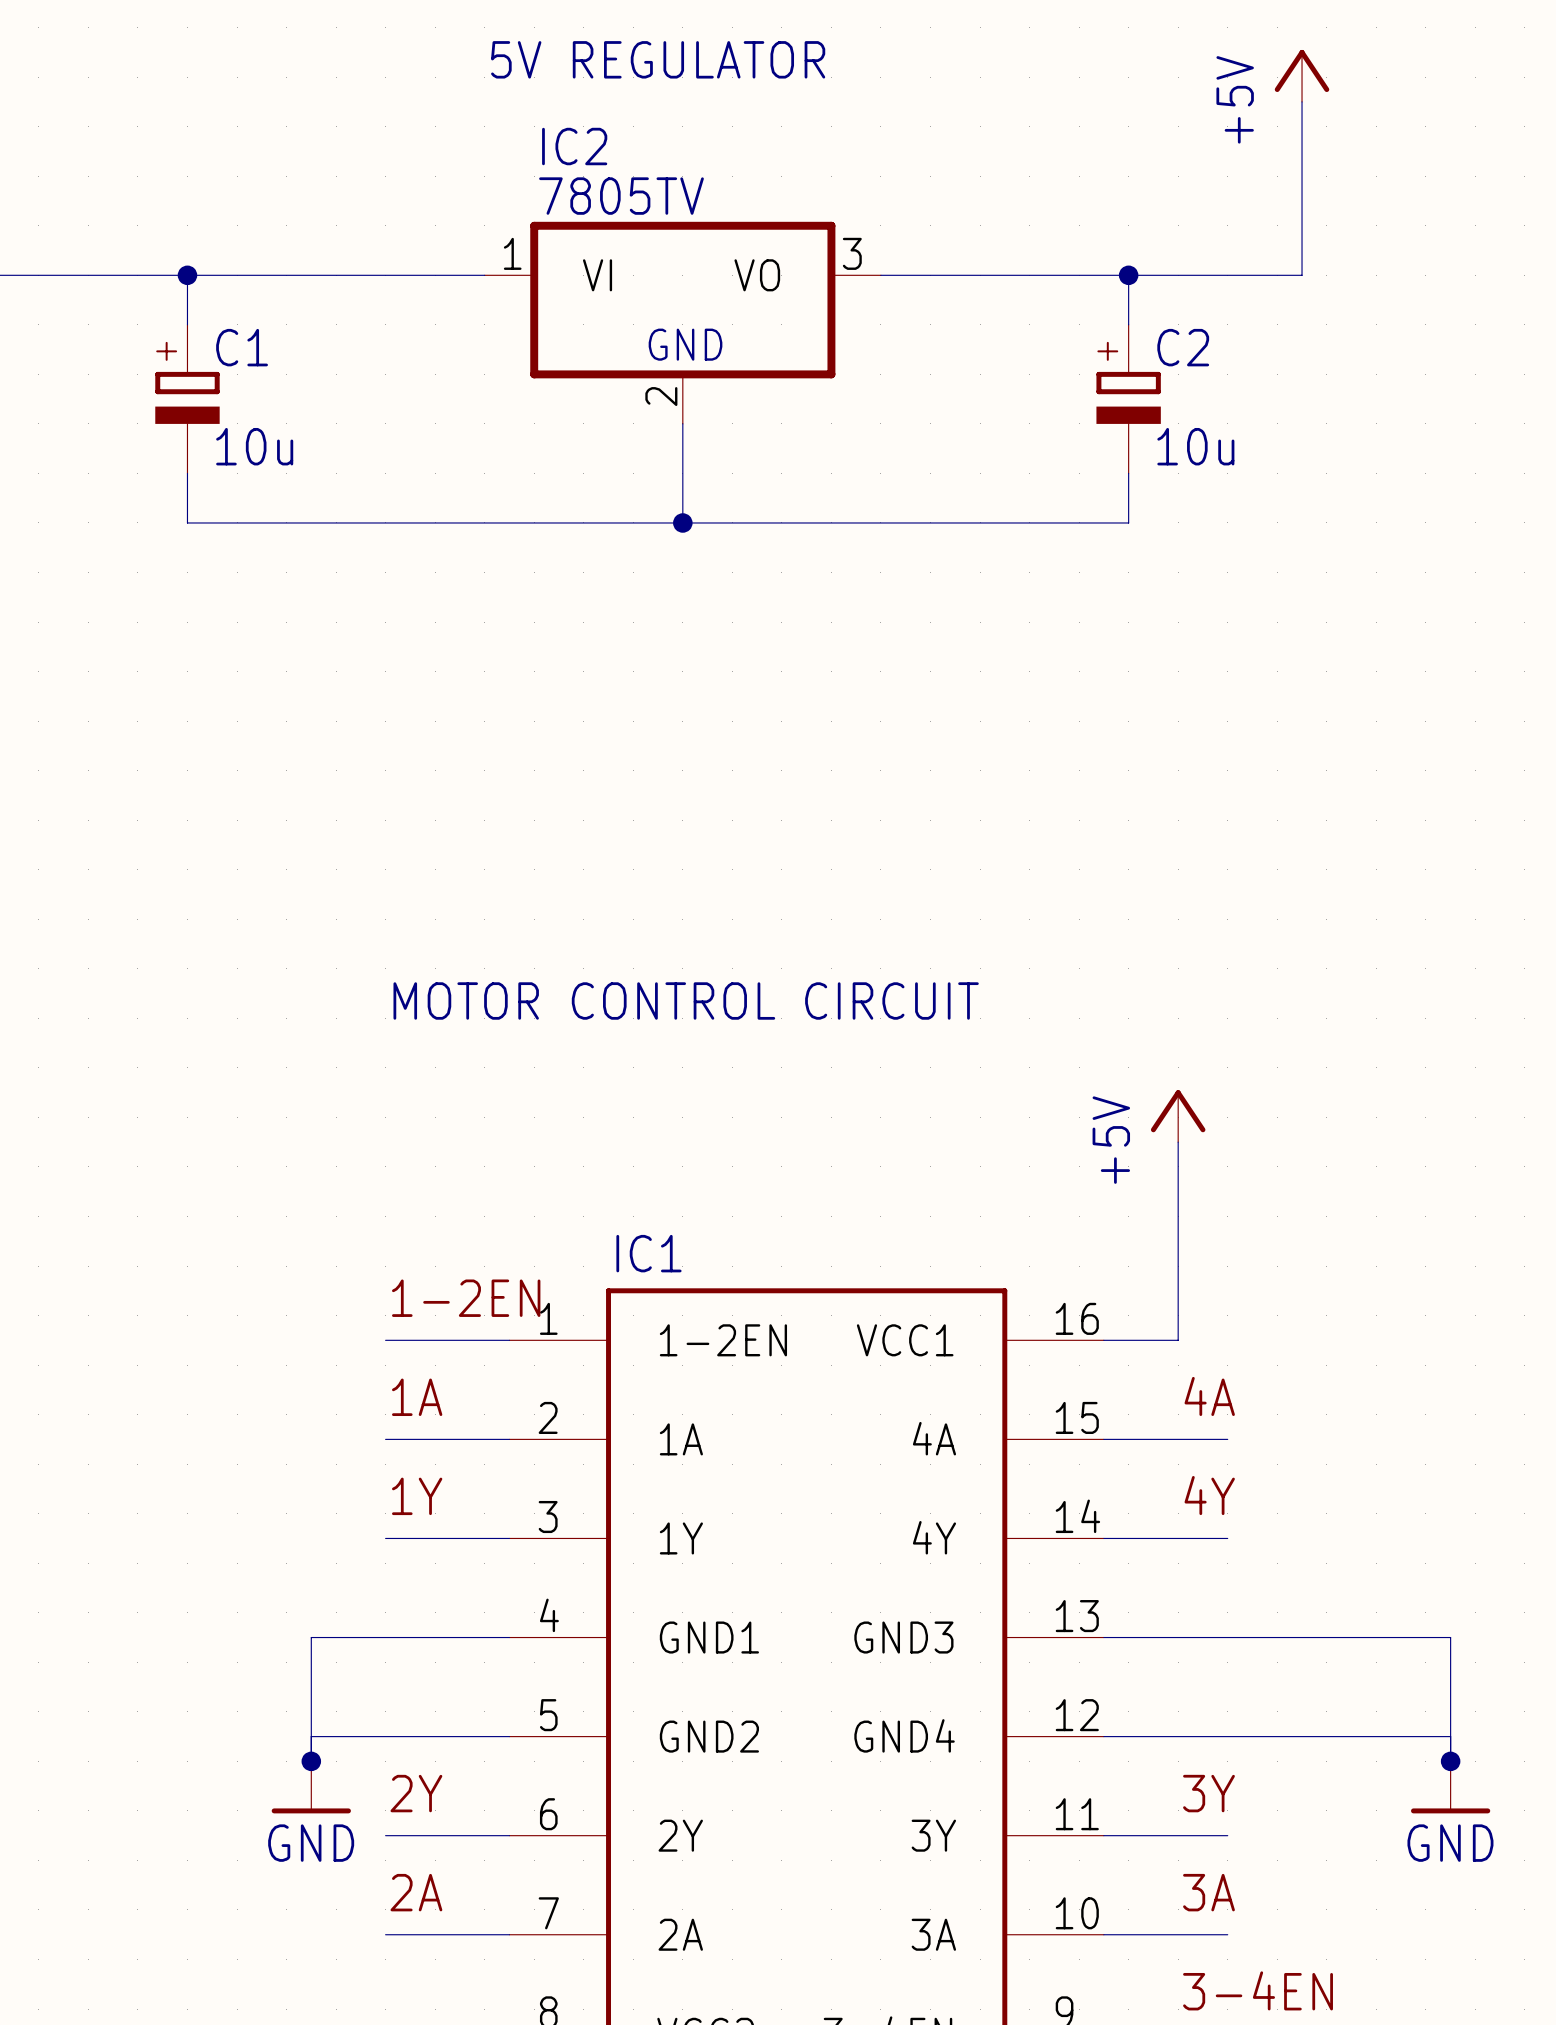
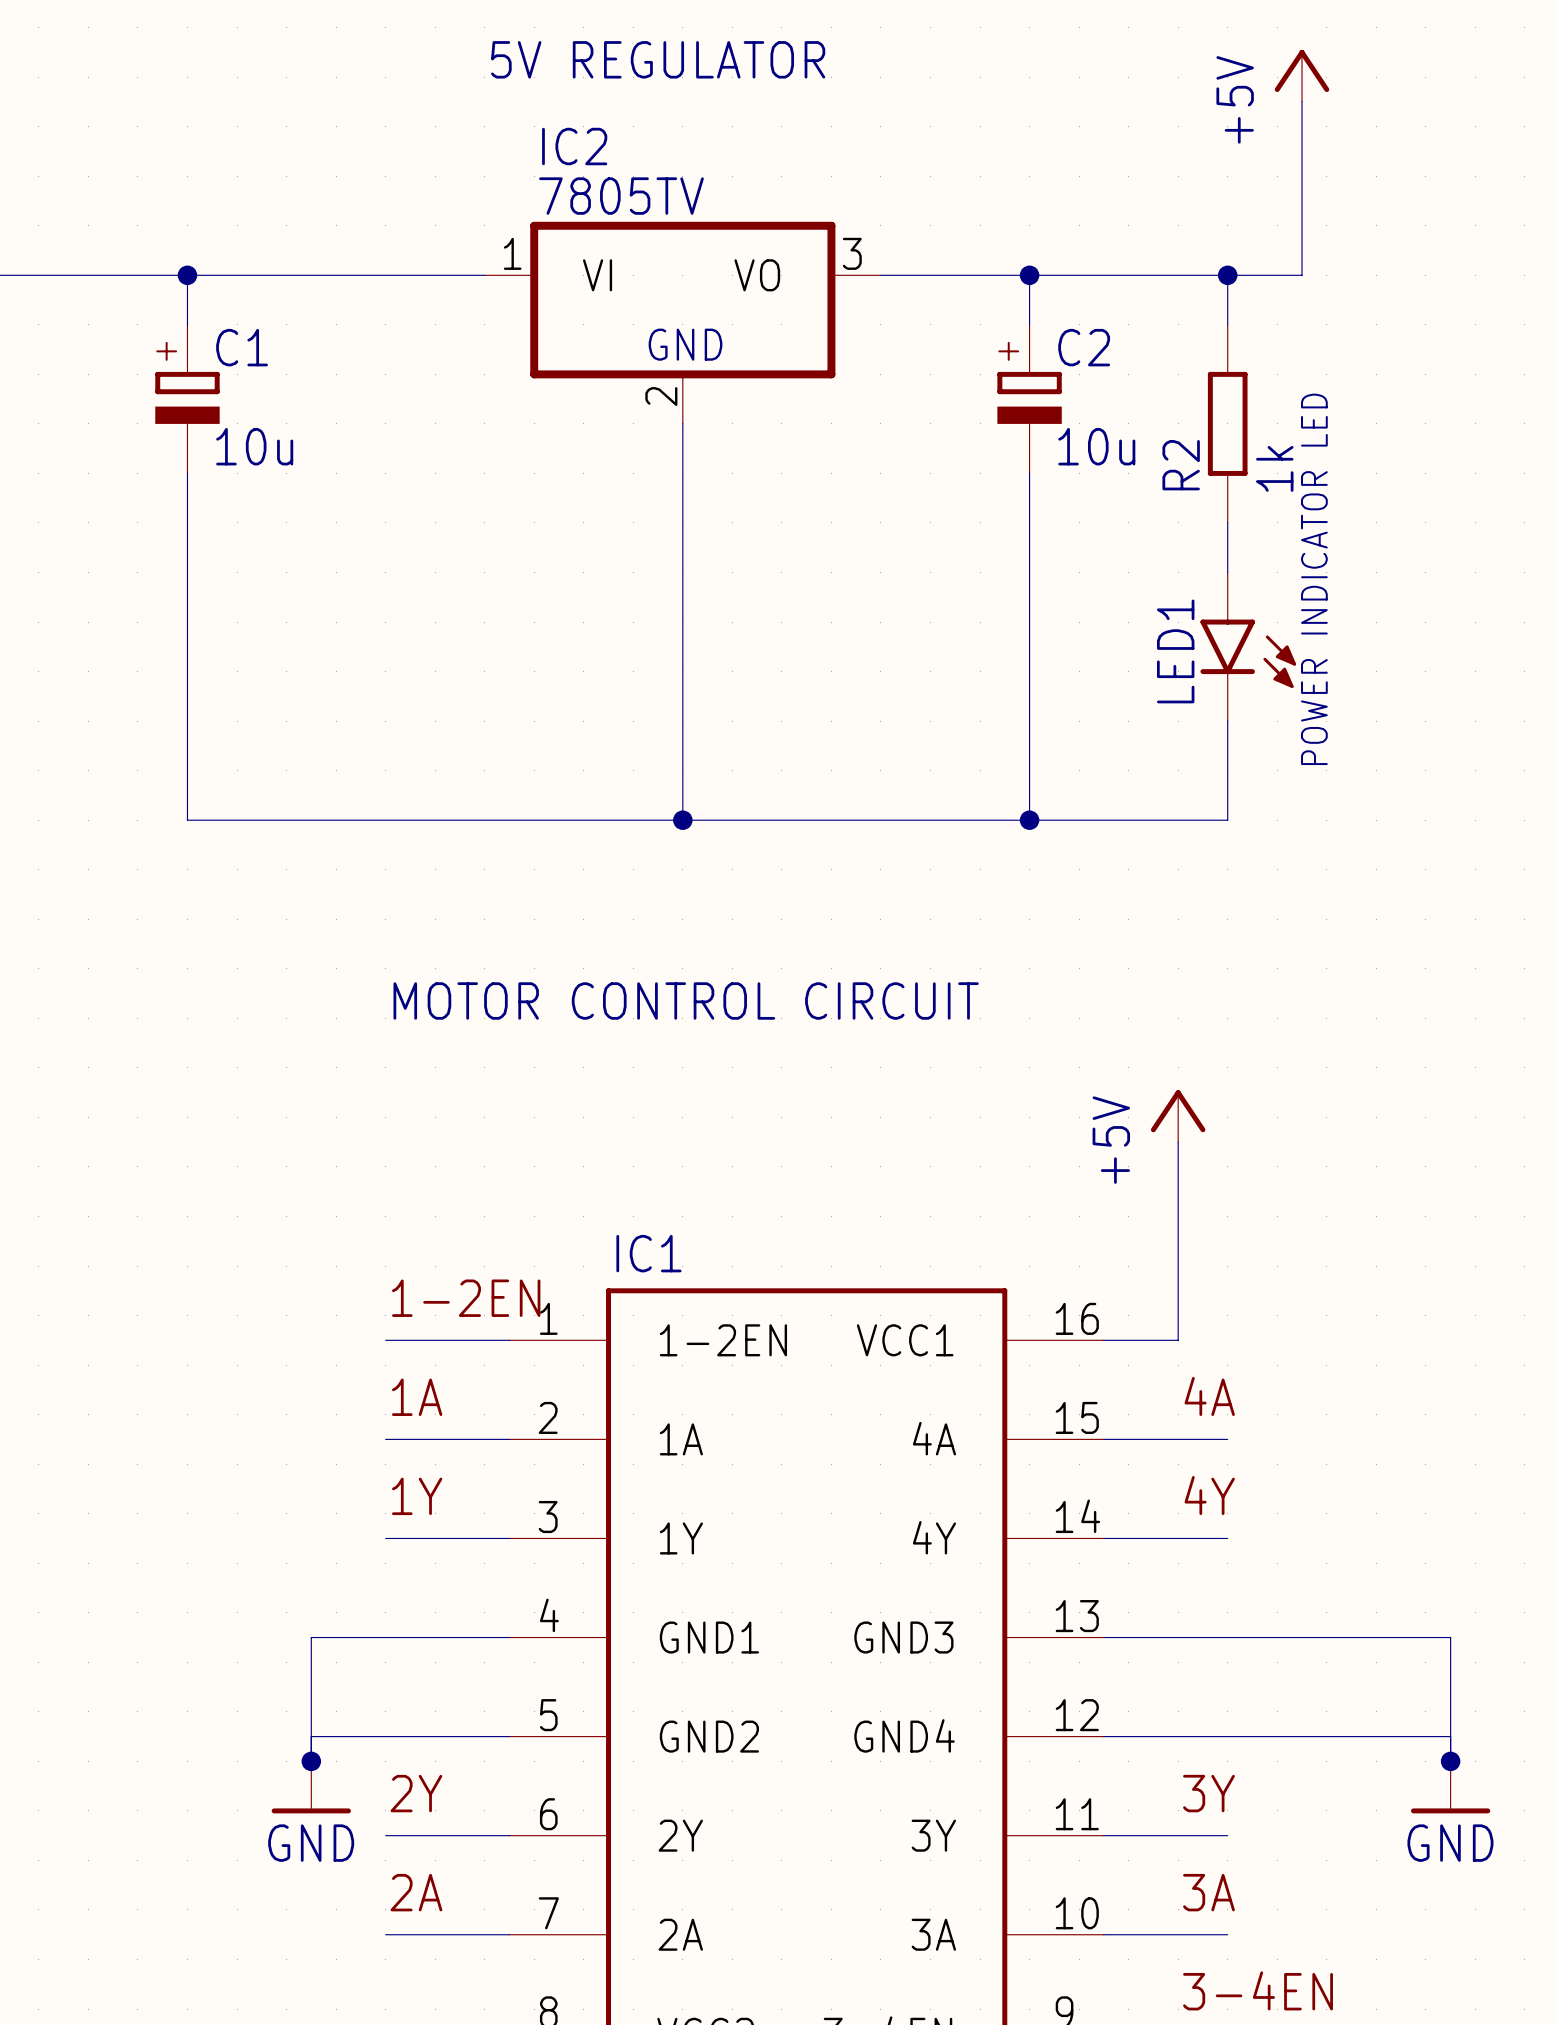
junction: none -> (1029, 275)
wire: (1128, 275) (1128, 324) -> (1029, 275) (1029, 324)
junction: (1128, 275) -> none
wire: none -> (1227, 275) (1227, 324)
junction: none -> (1227, 275)
C2 position: (1128, 399) -> (1029, 399)
R2: none -> 1k (1227, 423)
wire: none -> (1029, 473) (1029, 820)
wire: (1128, 473) (1128, 522) (187, 522) -> (1227, 721) (1227, 820) (187, 820) (187, 522)
wire: none -> (682, 522) (682, 820)
junction: (682, 522) -> none
wire: none -> (1227, 522) (1227, 572)
text: none -> POWER INDICATOR LED (1314, 579)
LED1: none -> (1248, 646)
junction: none -> (682, 820)
junction: none -> (1029, 820)

